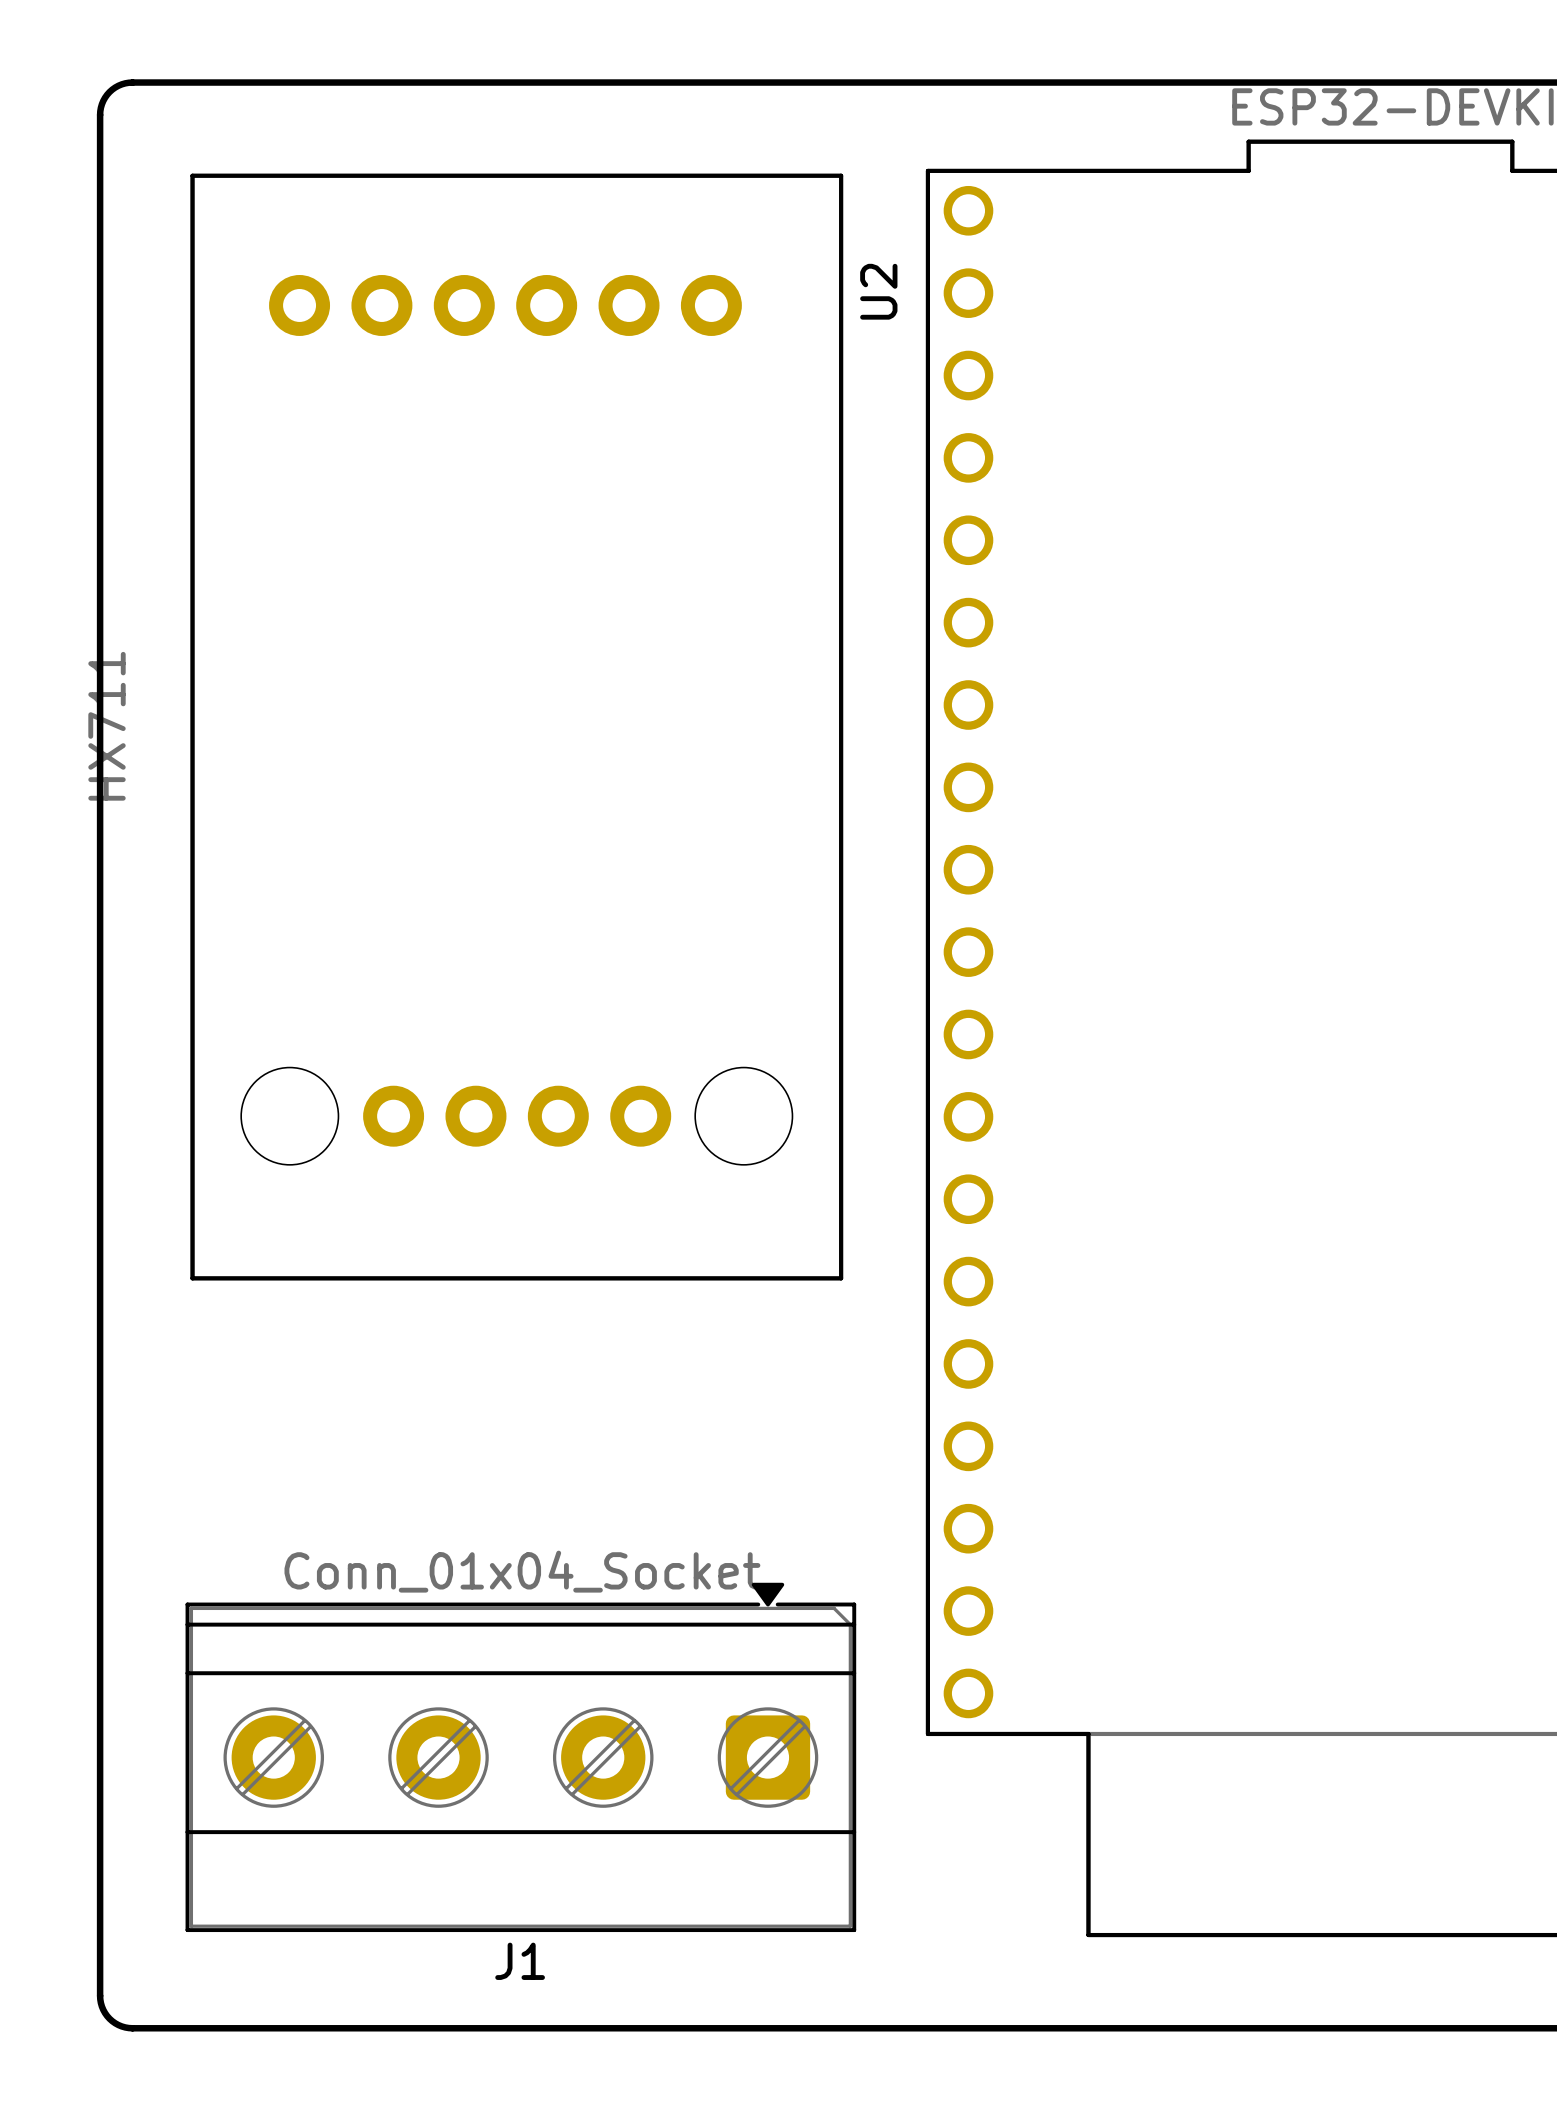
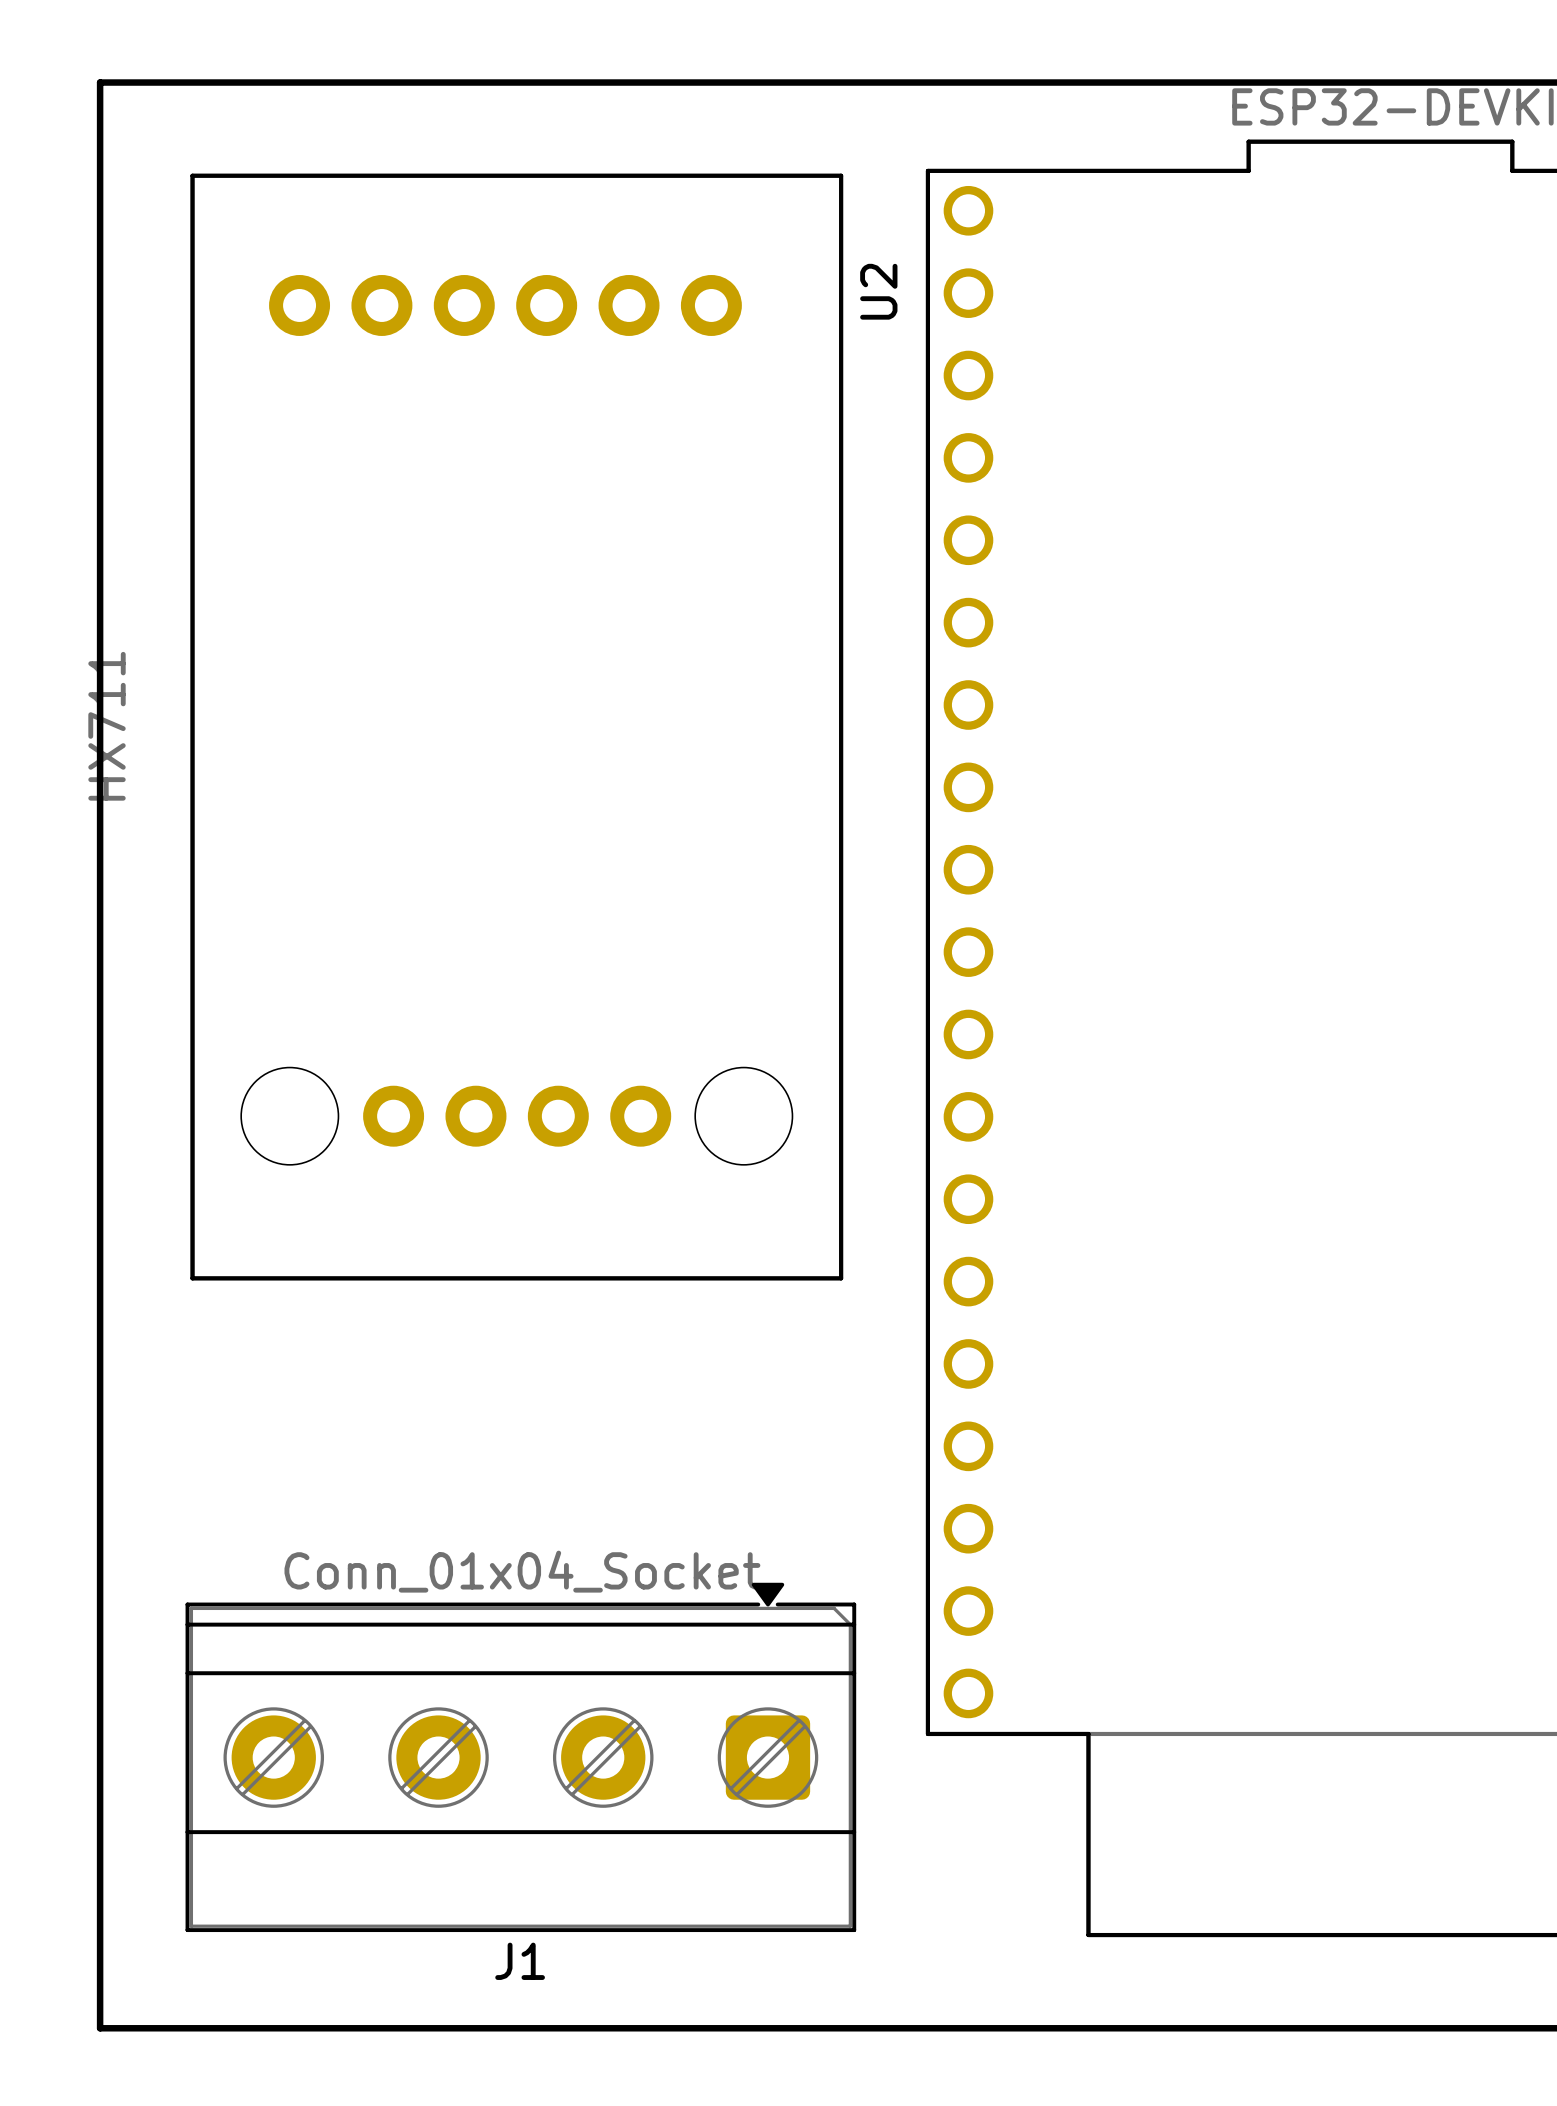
board edge: (132, 82) (118, 85) (109, 92) (103, 100) (100, 114) -> (132, 82) (100, 82) (100, 114)
board edge: (100, 1995) (101, 2006) (109, 2018) (118, 2025) (132, 2028) -> (100, 1995) (100, 2028) (132, 2028)

